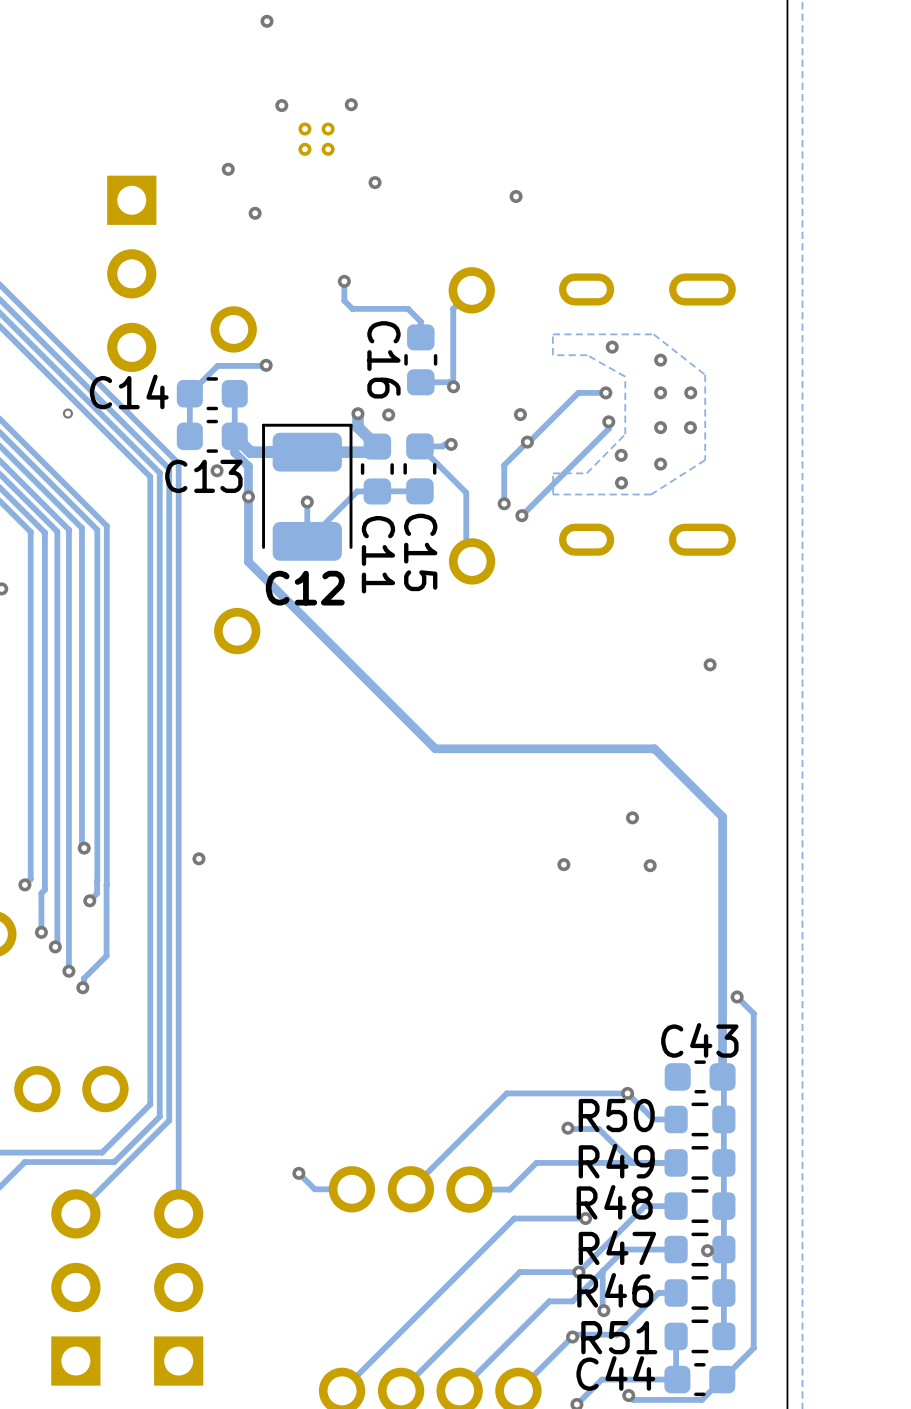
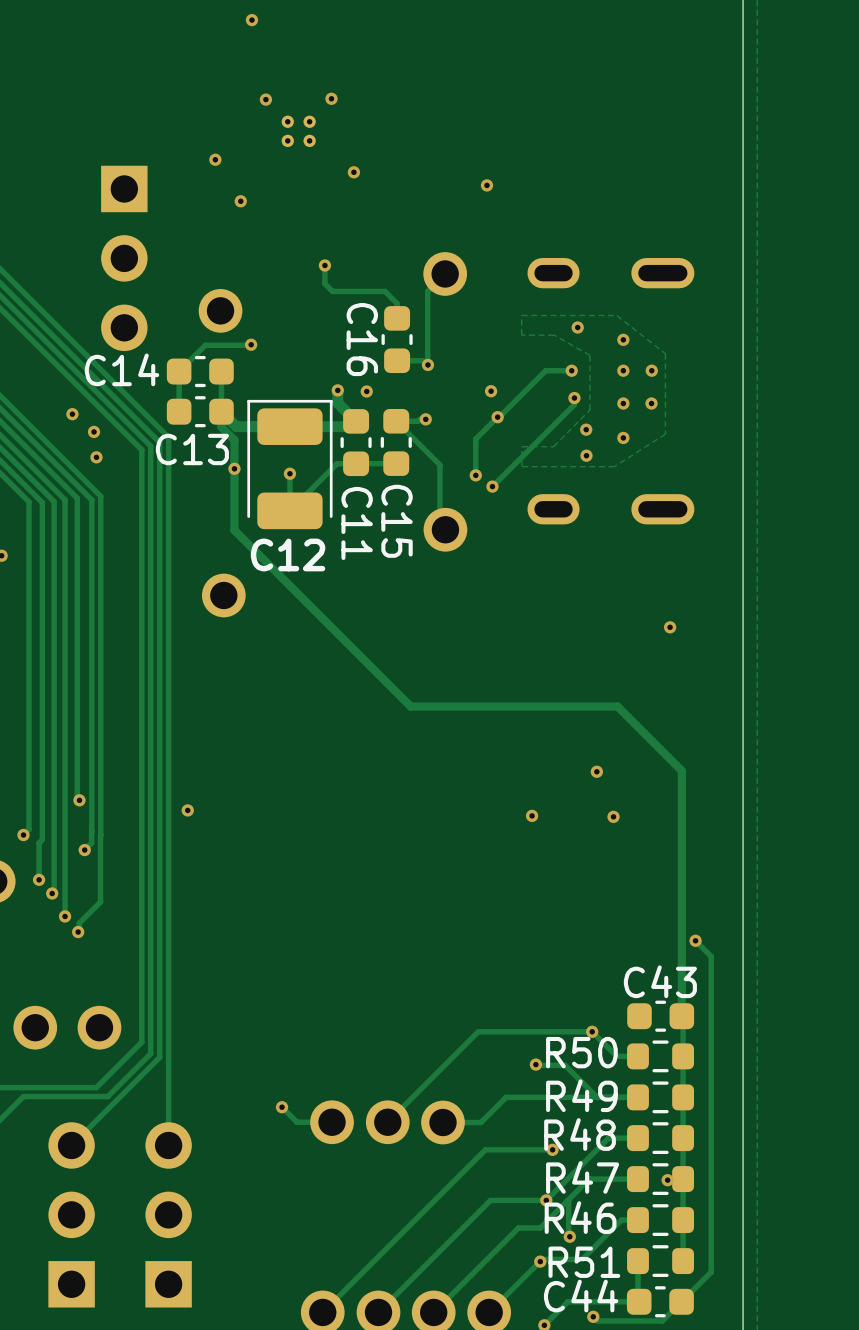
via: (67, 413) -> none
via: none -> (72, 414)
via: none -> (94, 431)
via: (217, 470) -> none
via: none -> (96, 457)

